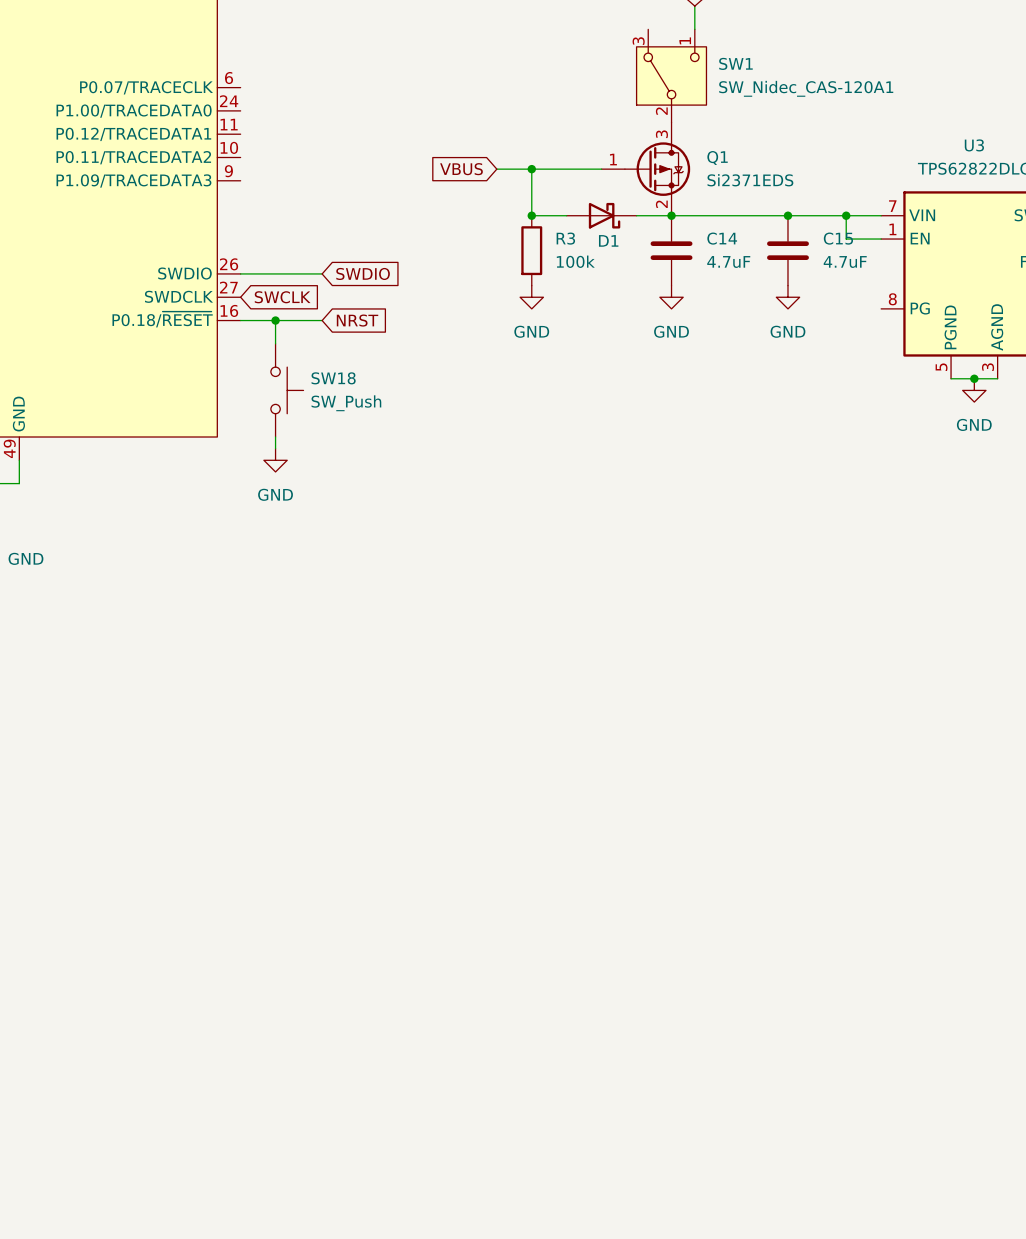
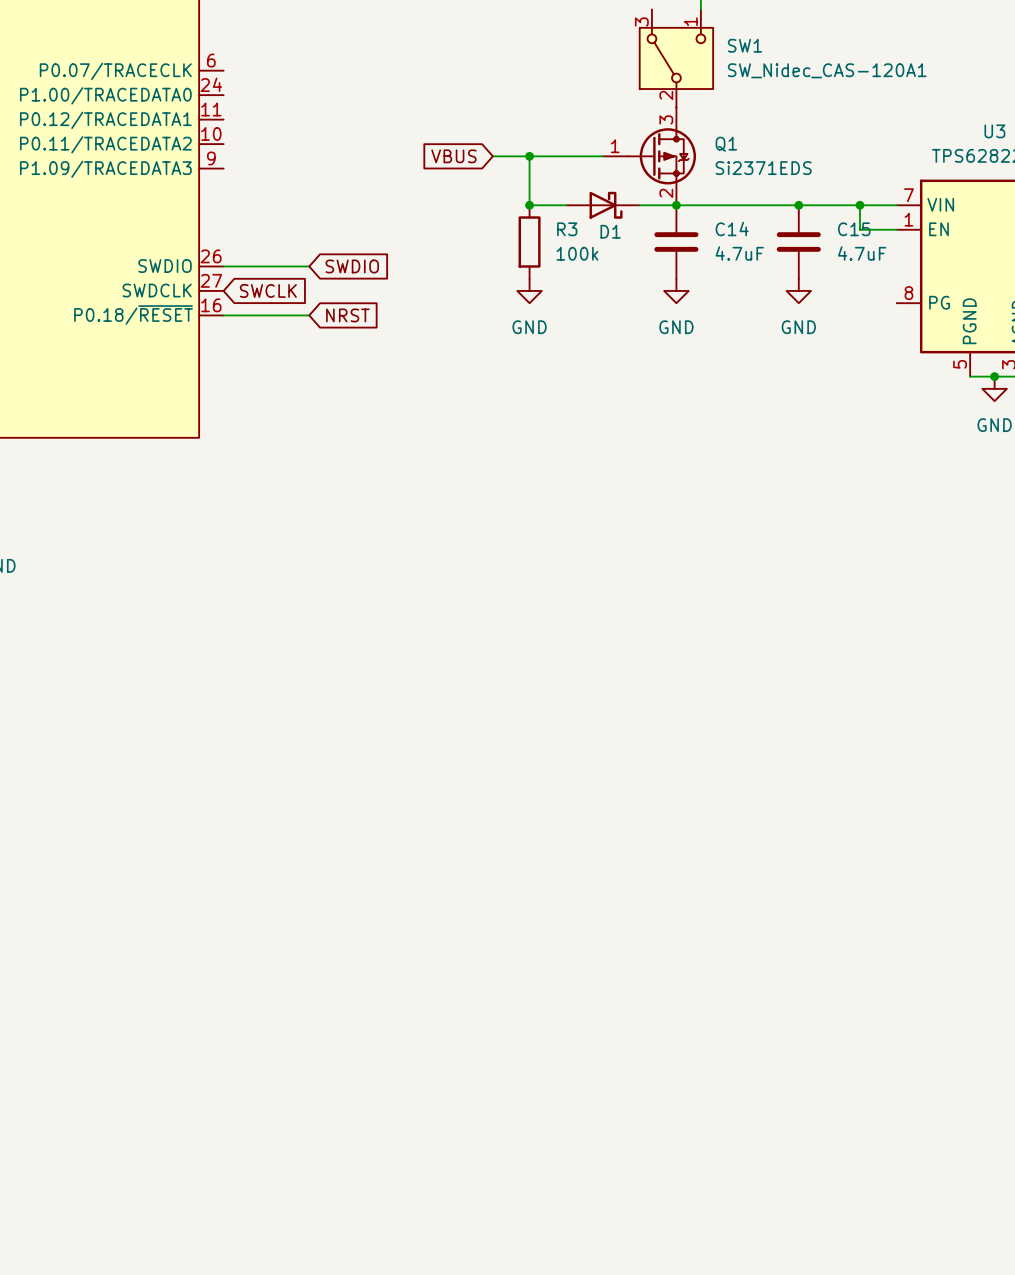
wire: (275, 320) (275, 343) -> none
junction: (275, 320) -> none
SW18: SW_Push (287, 390) -> none
wire: (275, 437) (275, 448) -> none
power symbol: GND (275, 460) -> none

